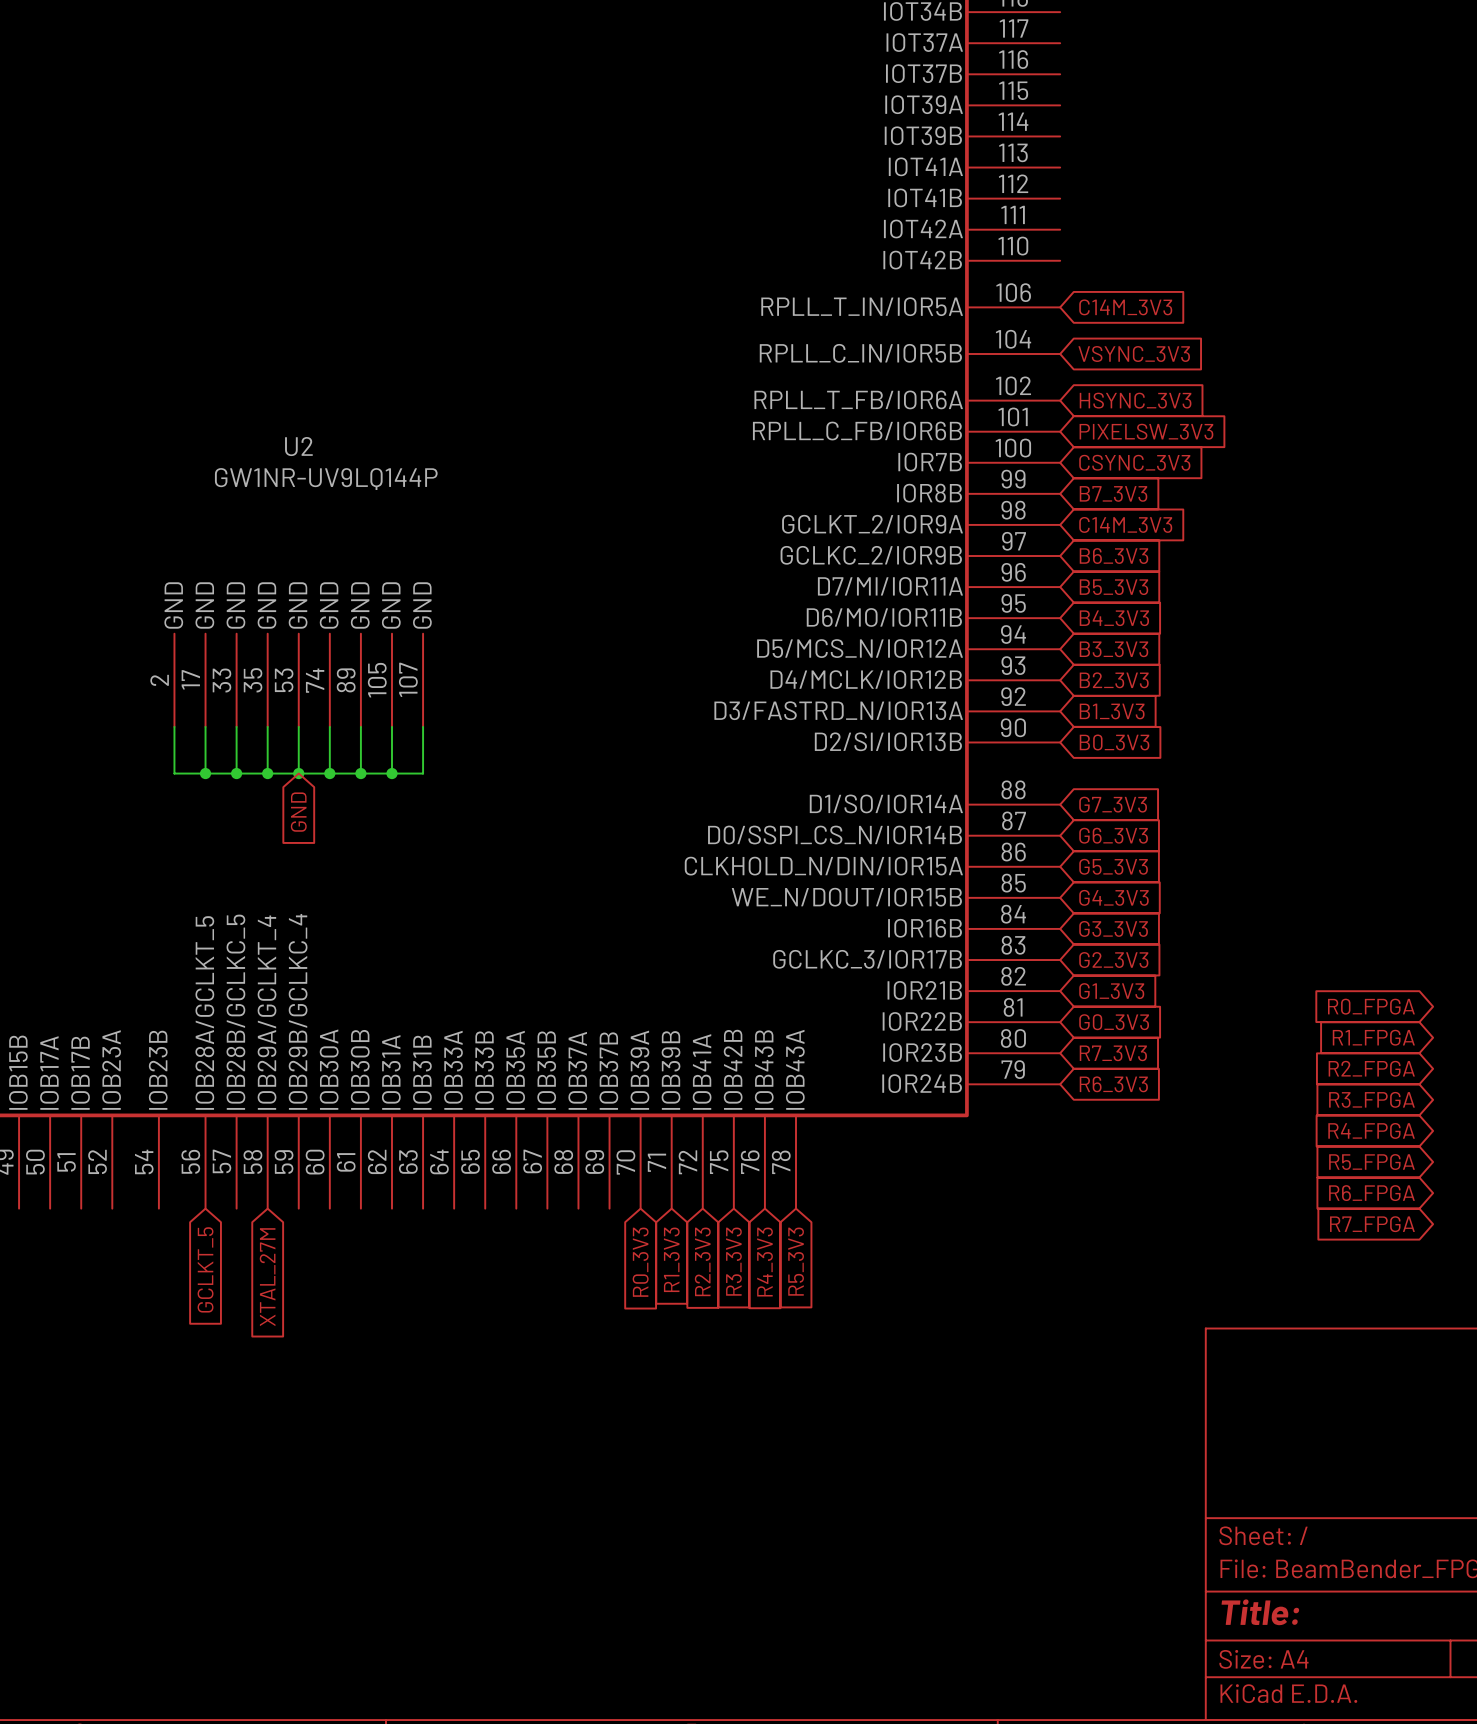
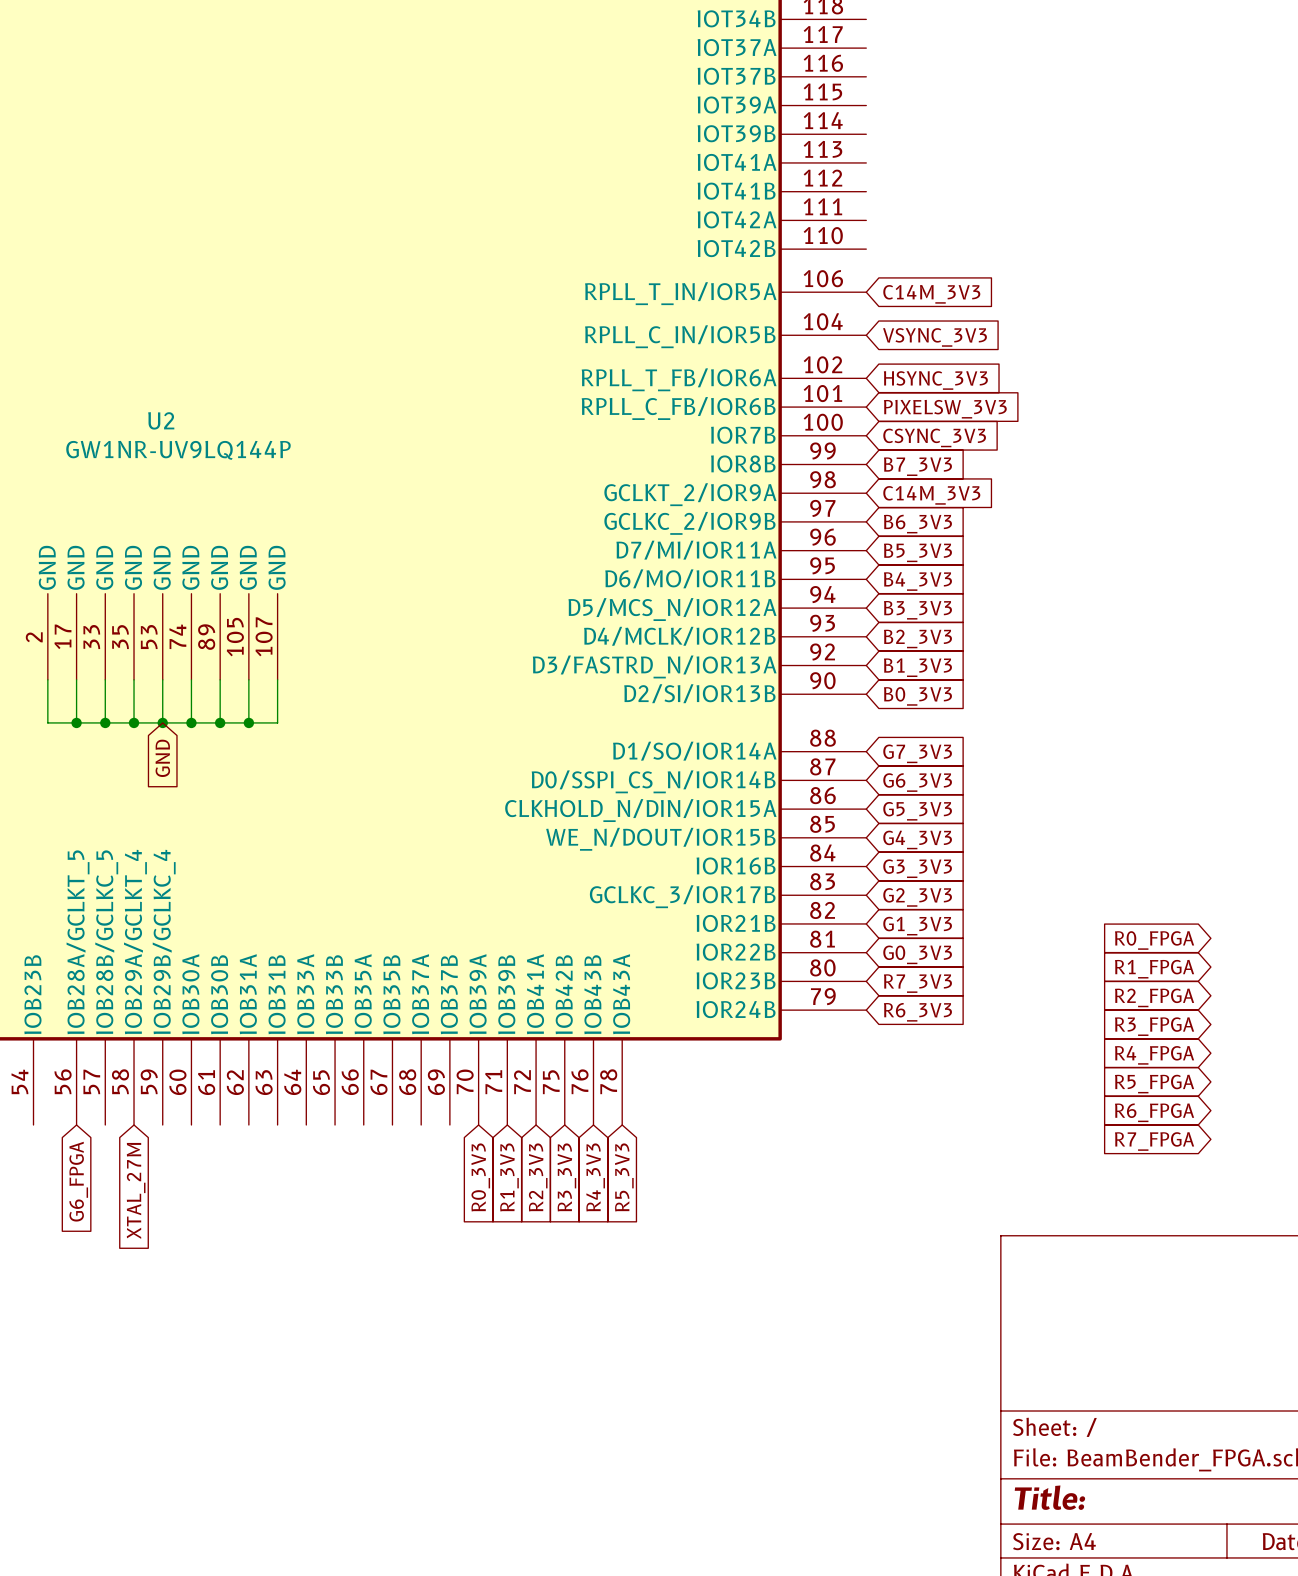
global label: GCLKT_5 (205, 1269) -> G6_FPGA (78, 1181)

